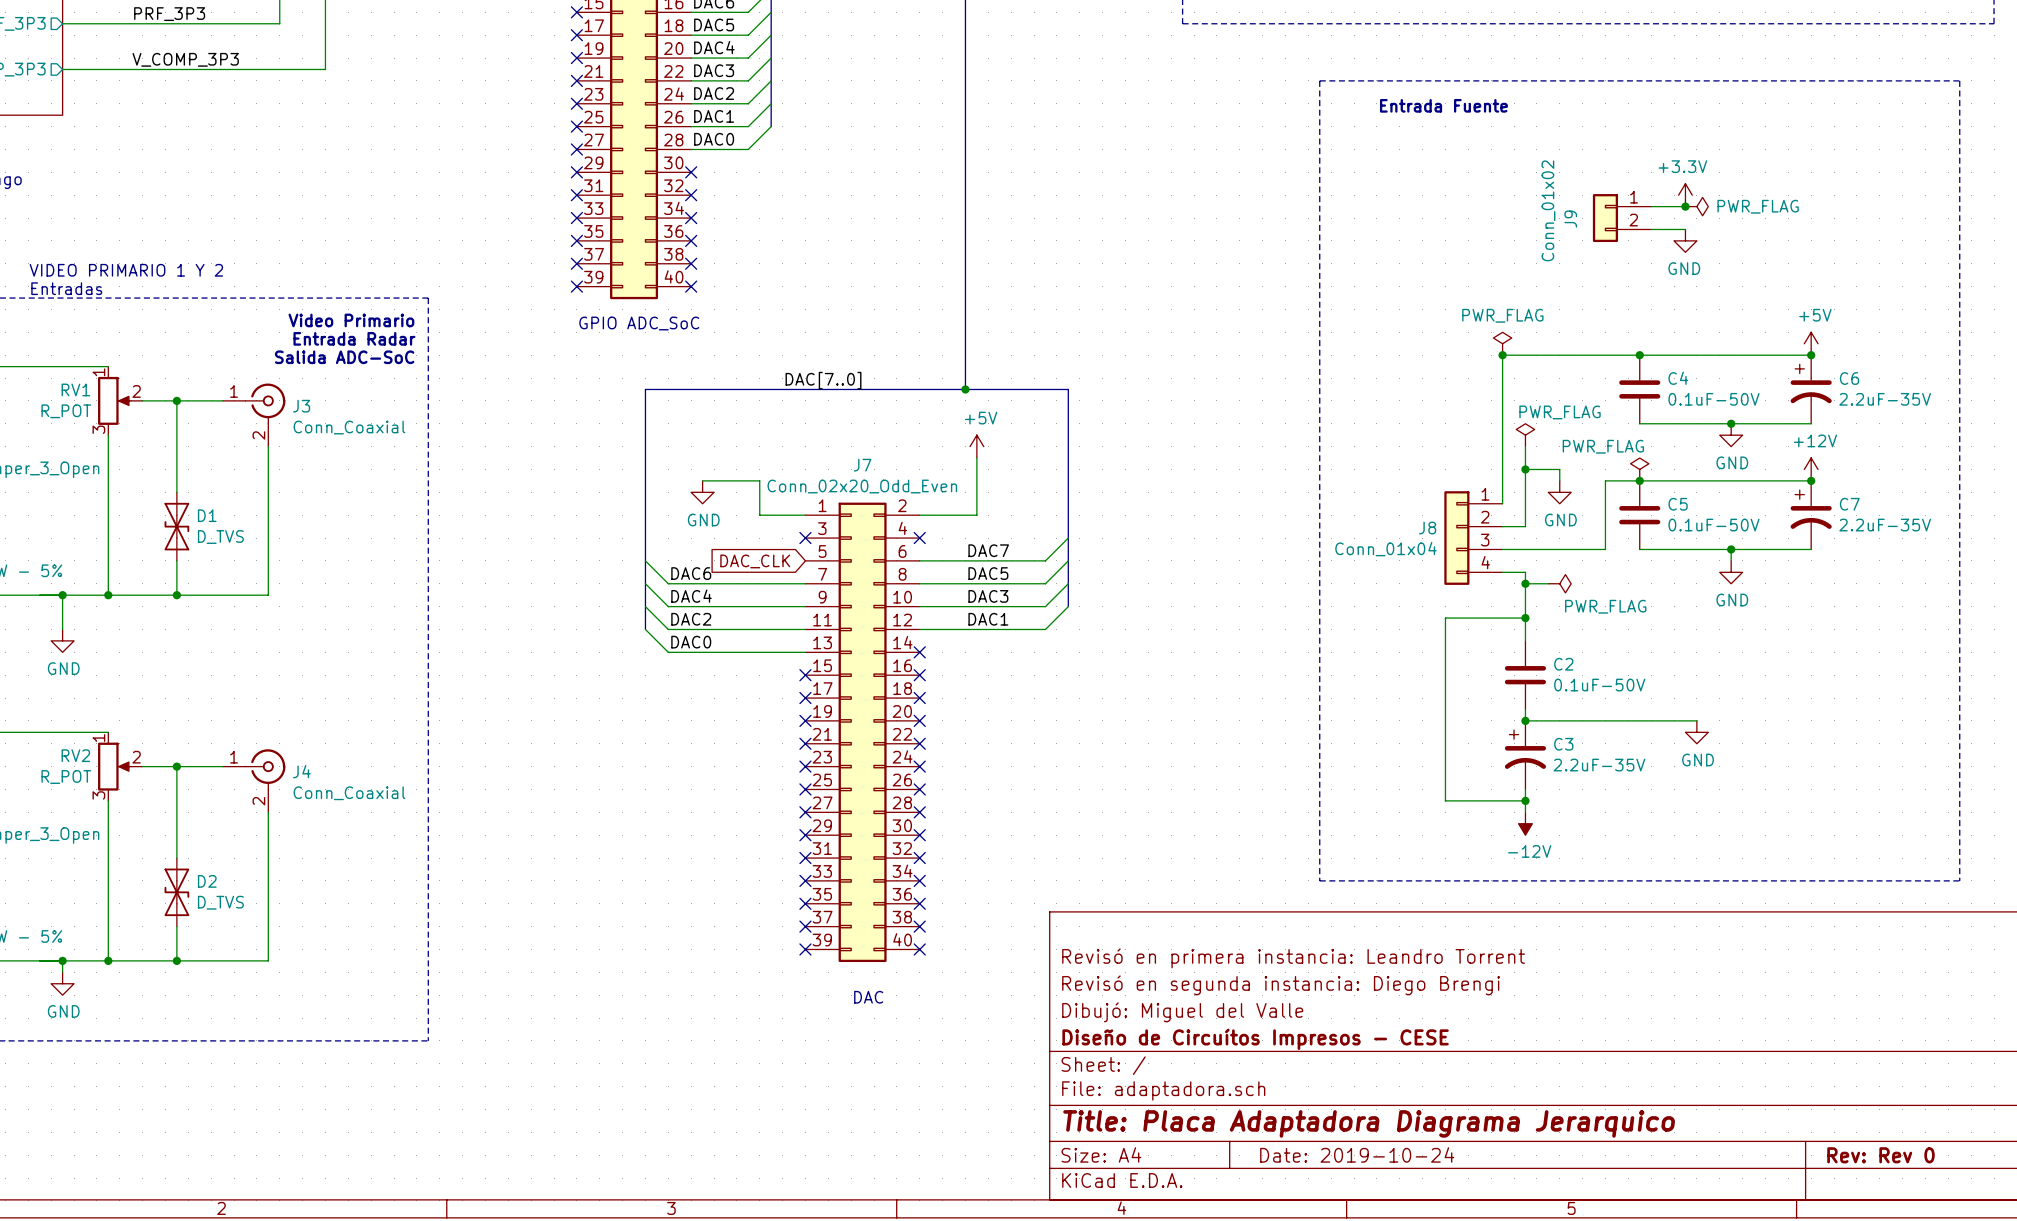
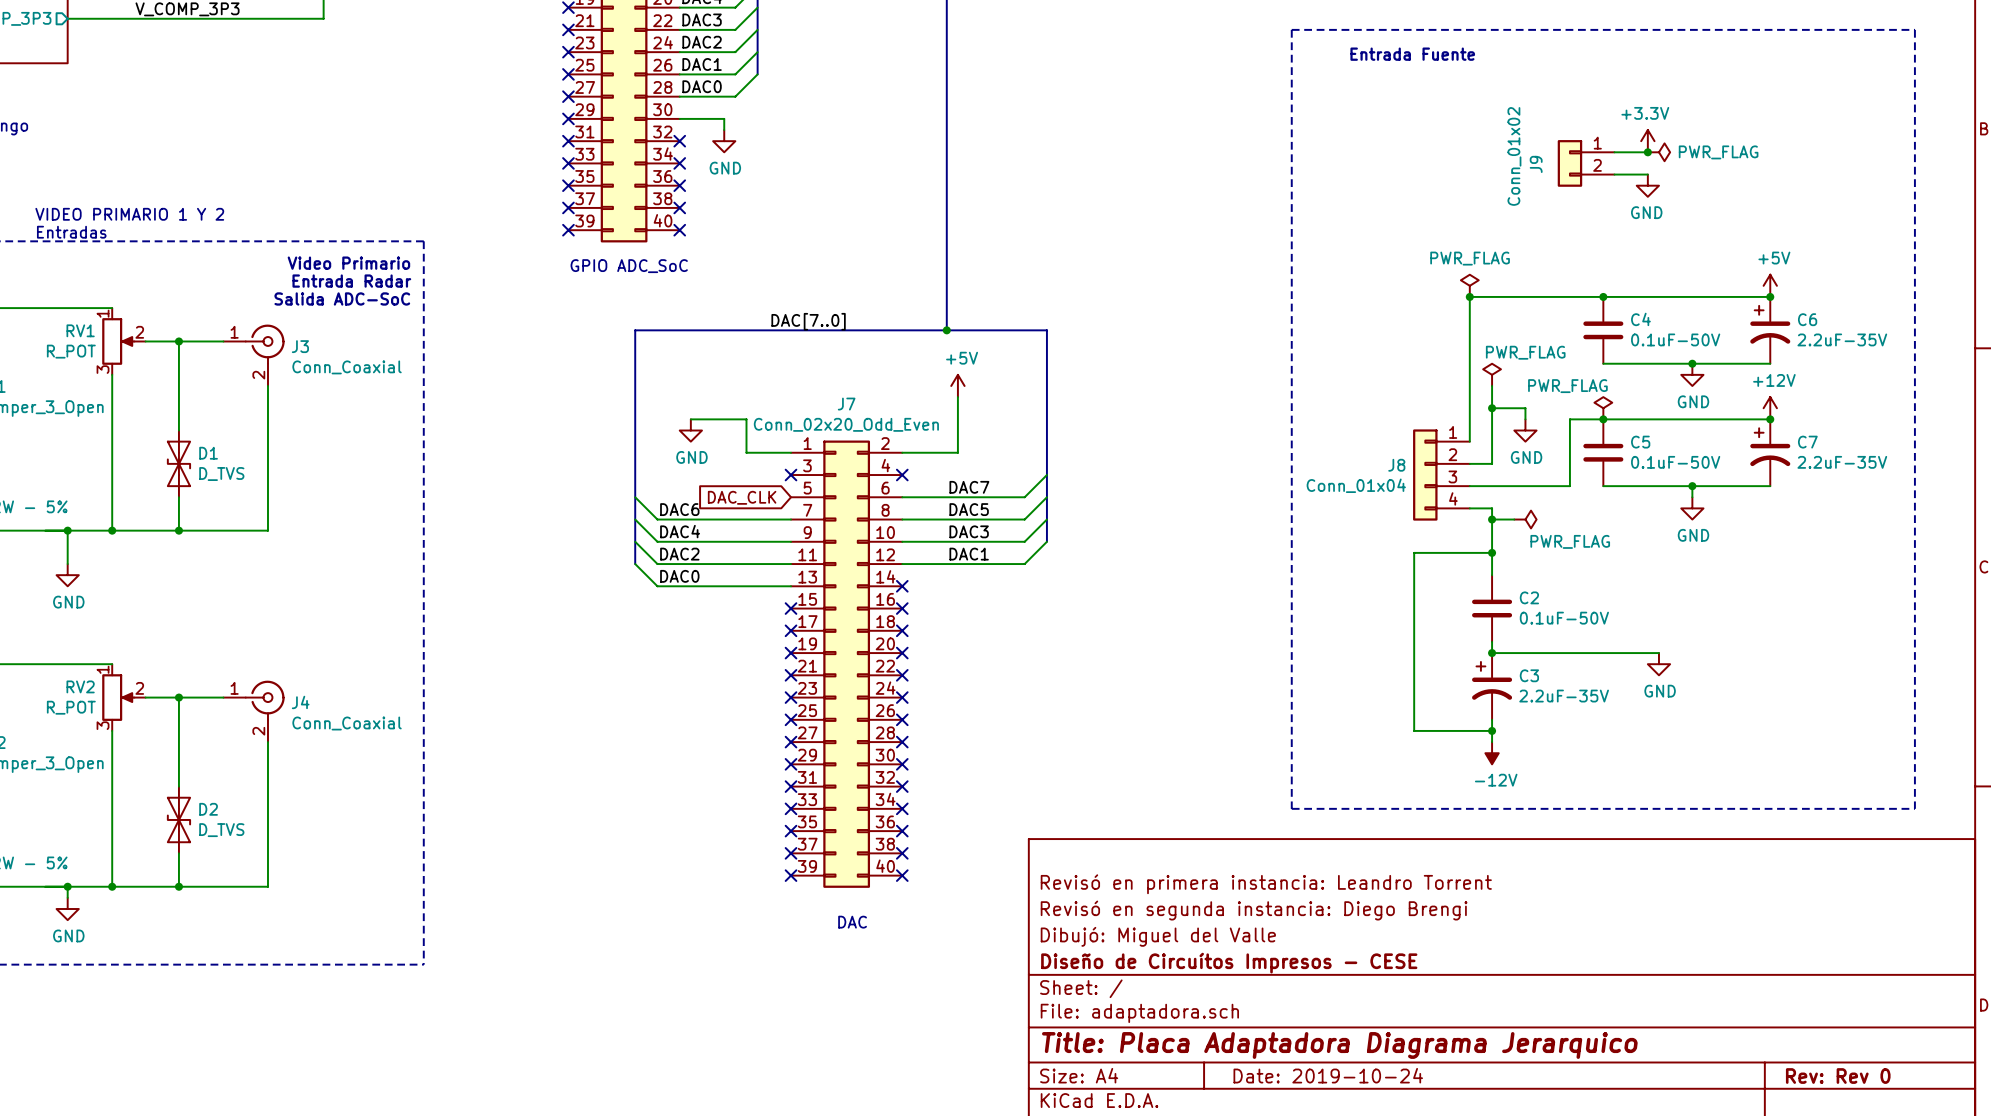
wire: none -> (679, 118) (724, 118) (724, 130)
no-connect mark: (691, 172) -> none
power symbol: none -> GND (724, 141)

